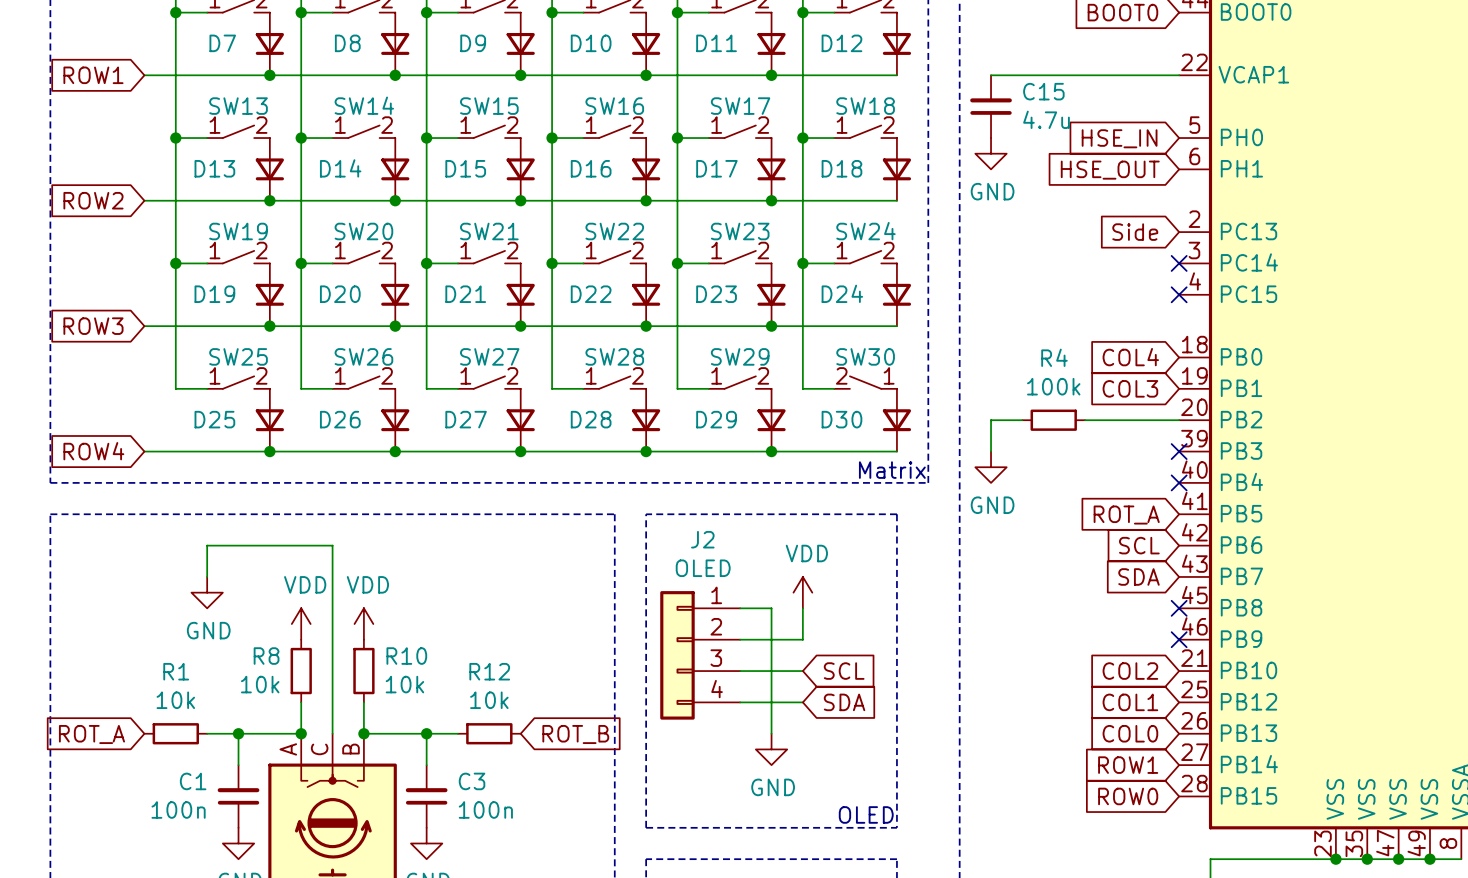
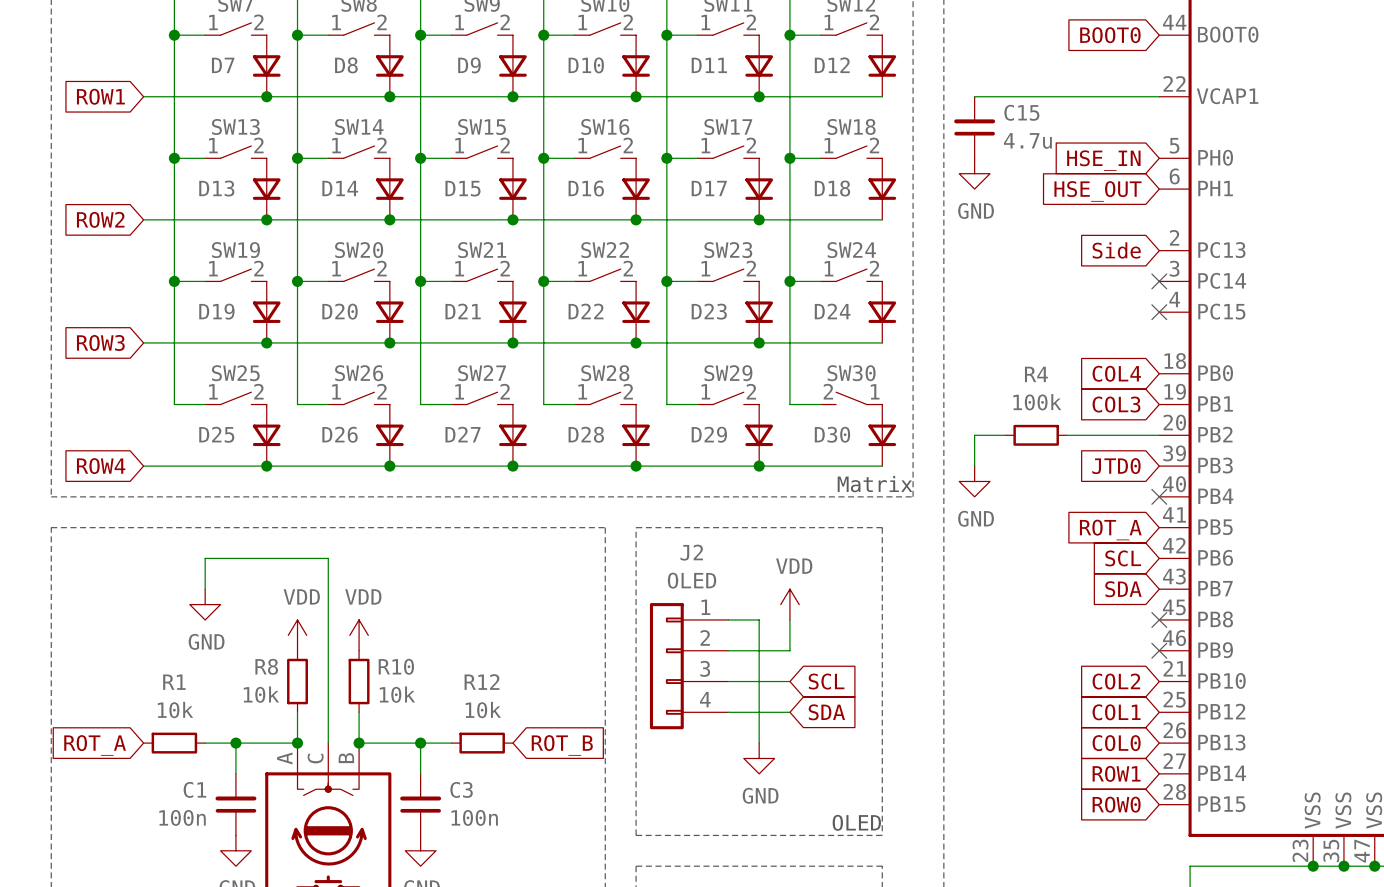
global label: none -> JTD0 (1116, 466)
no-connect mark: (1179, 451) -> none

